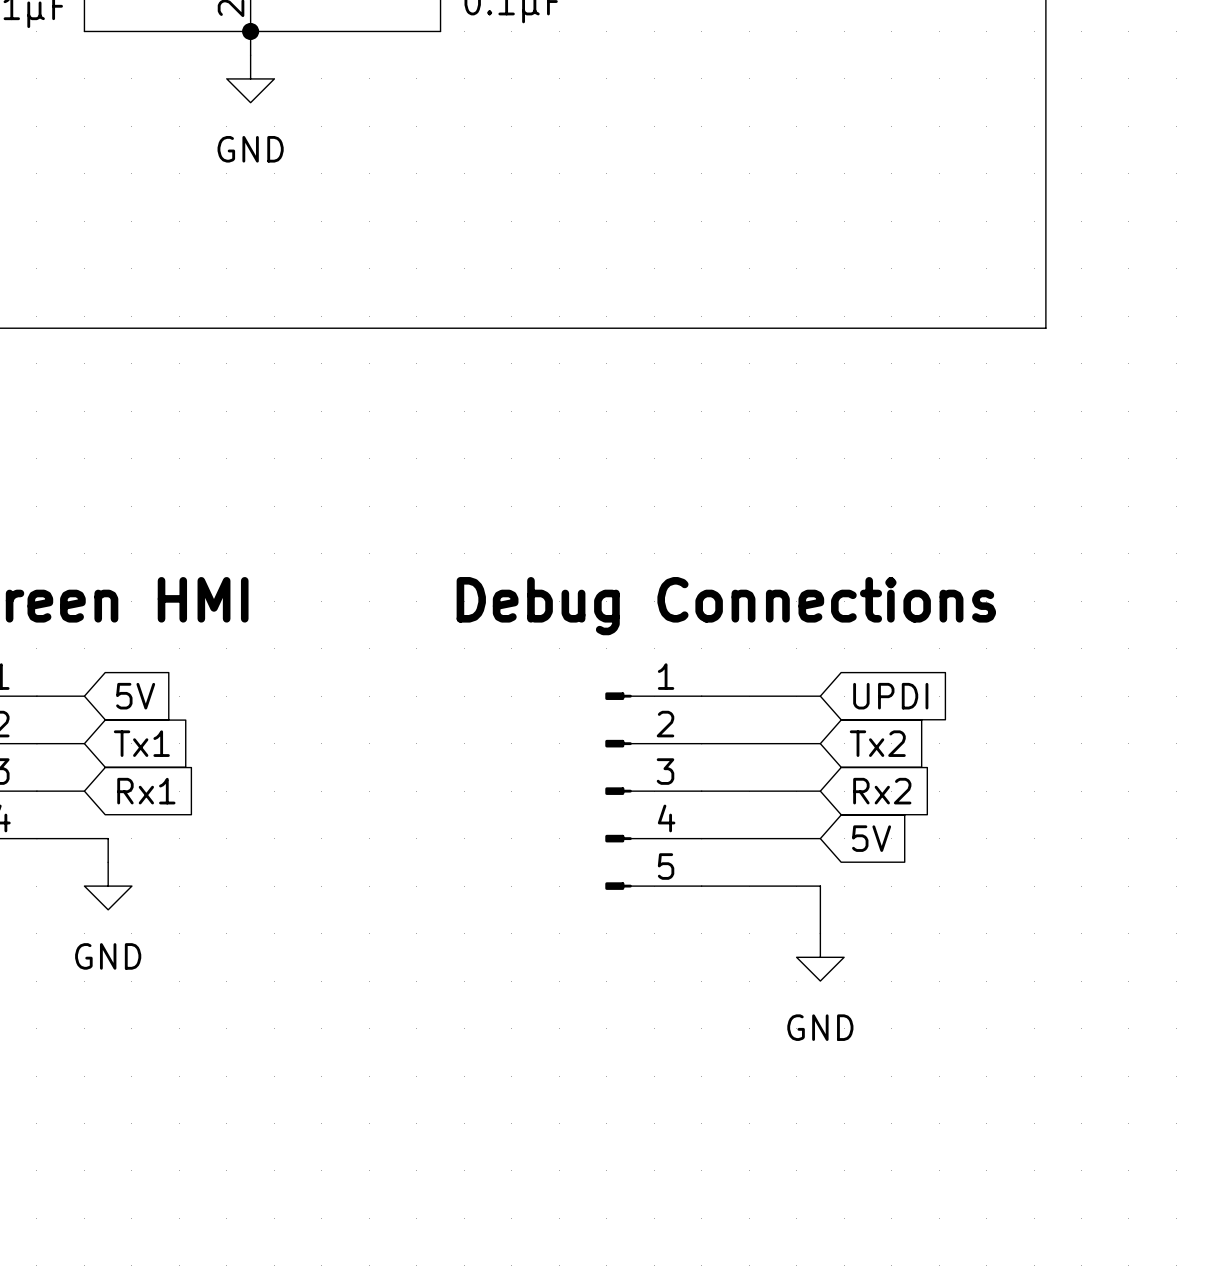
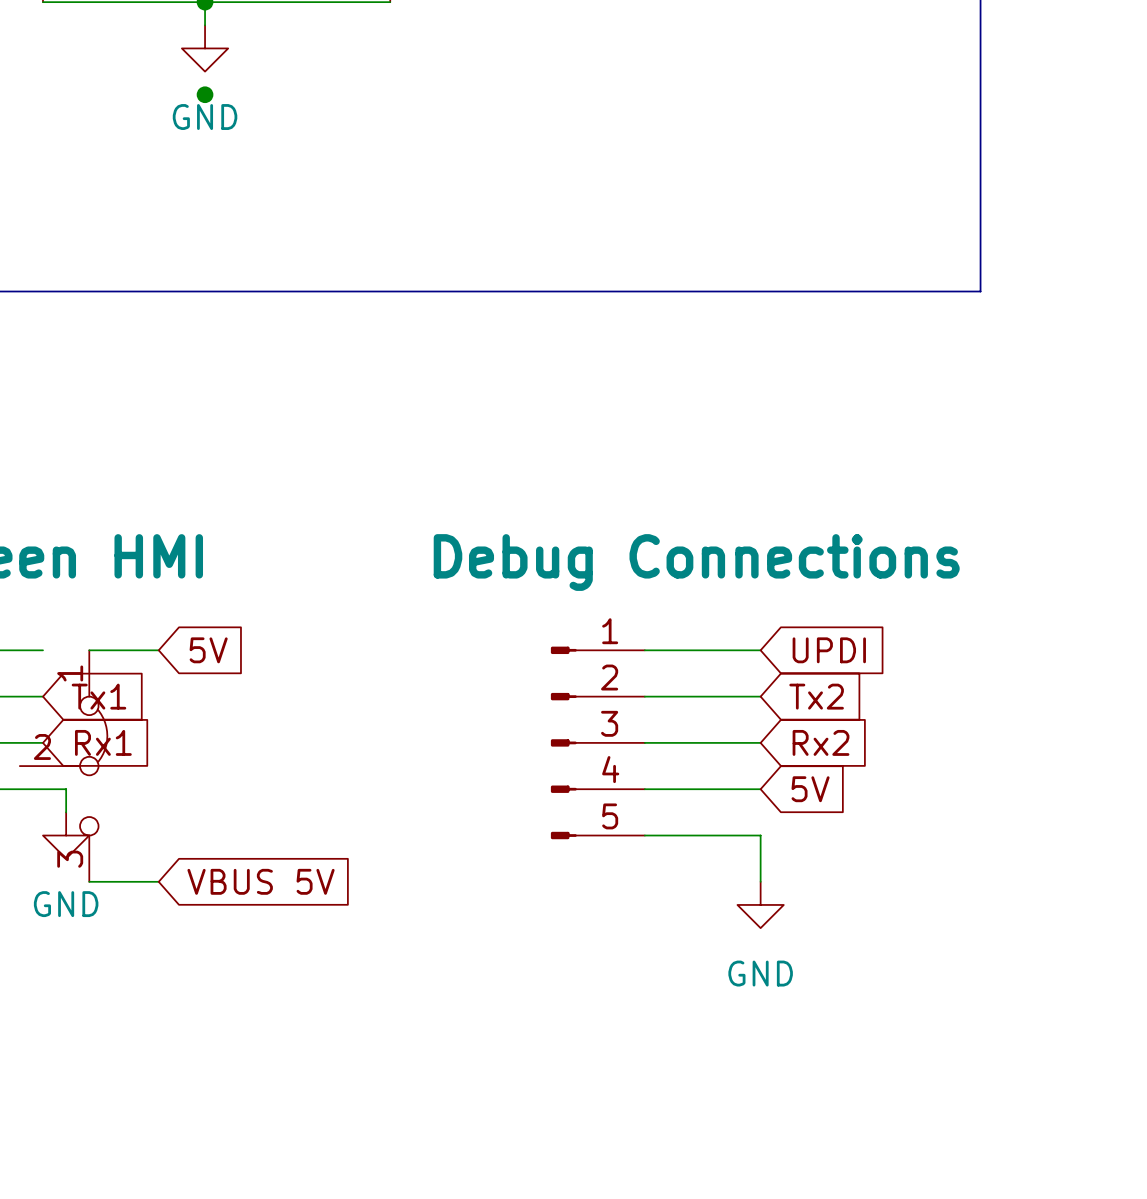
junction: none -> (205, 94)
part value position: Debug Connections (726, 606) -> Debug Connections (696, 562)
wire: none -> (89, 650) (158, 650)
global label position: 5V (135, 696) -> 5V (208, 650)
part: none -> (63, 766)
wire: none -> (89, 881) (158, 881)
global label: none -> VBUS 5V (261, 881)

